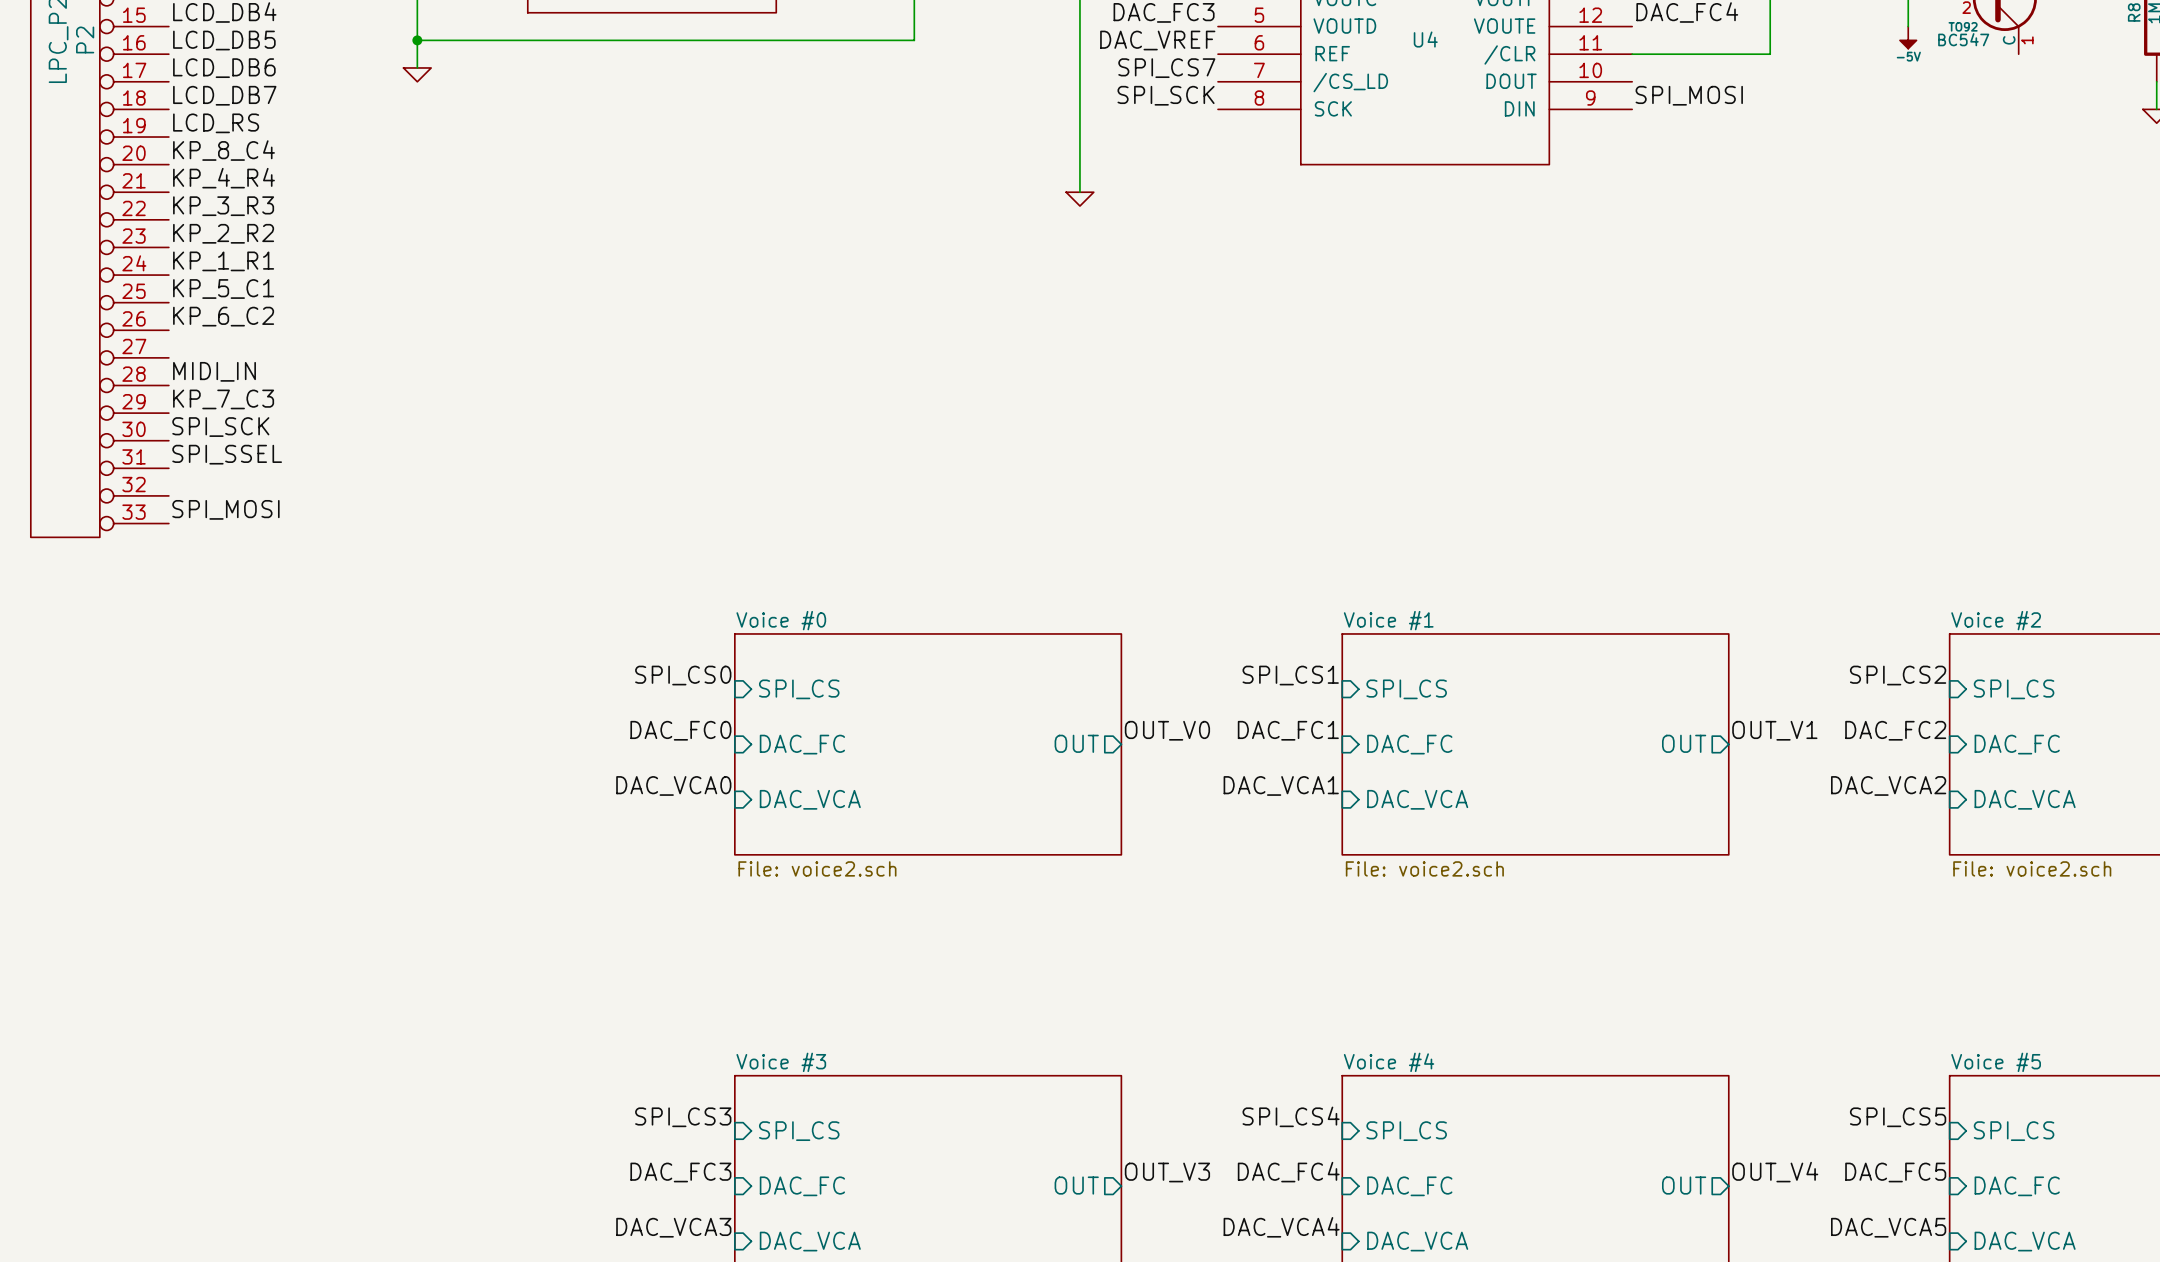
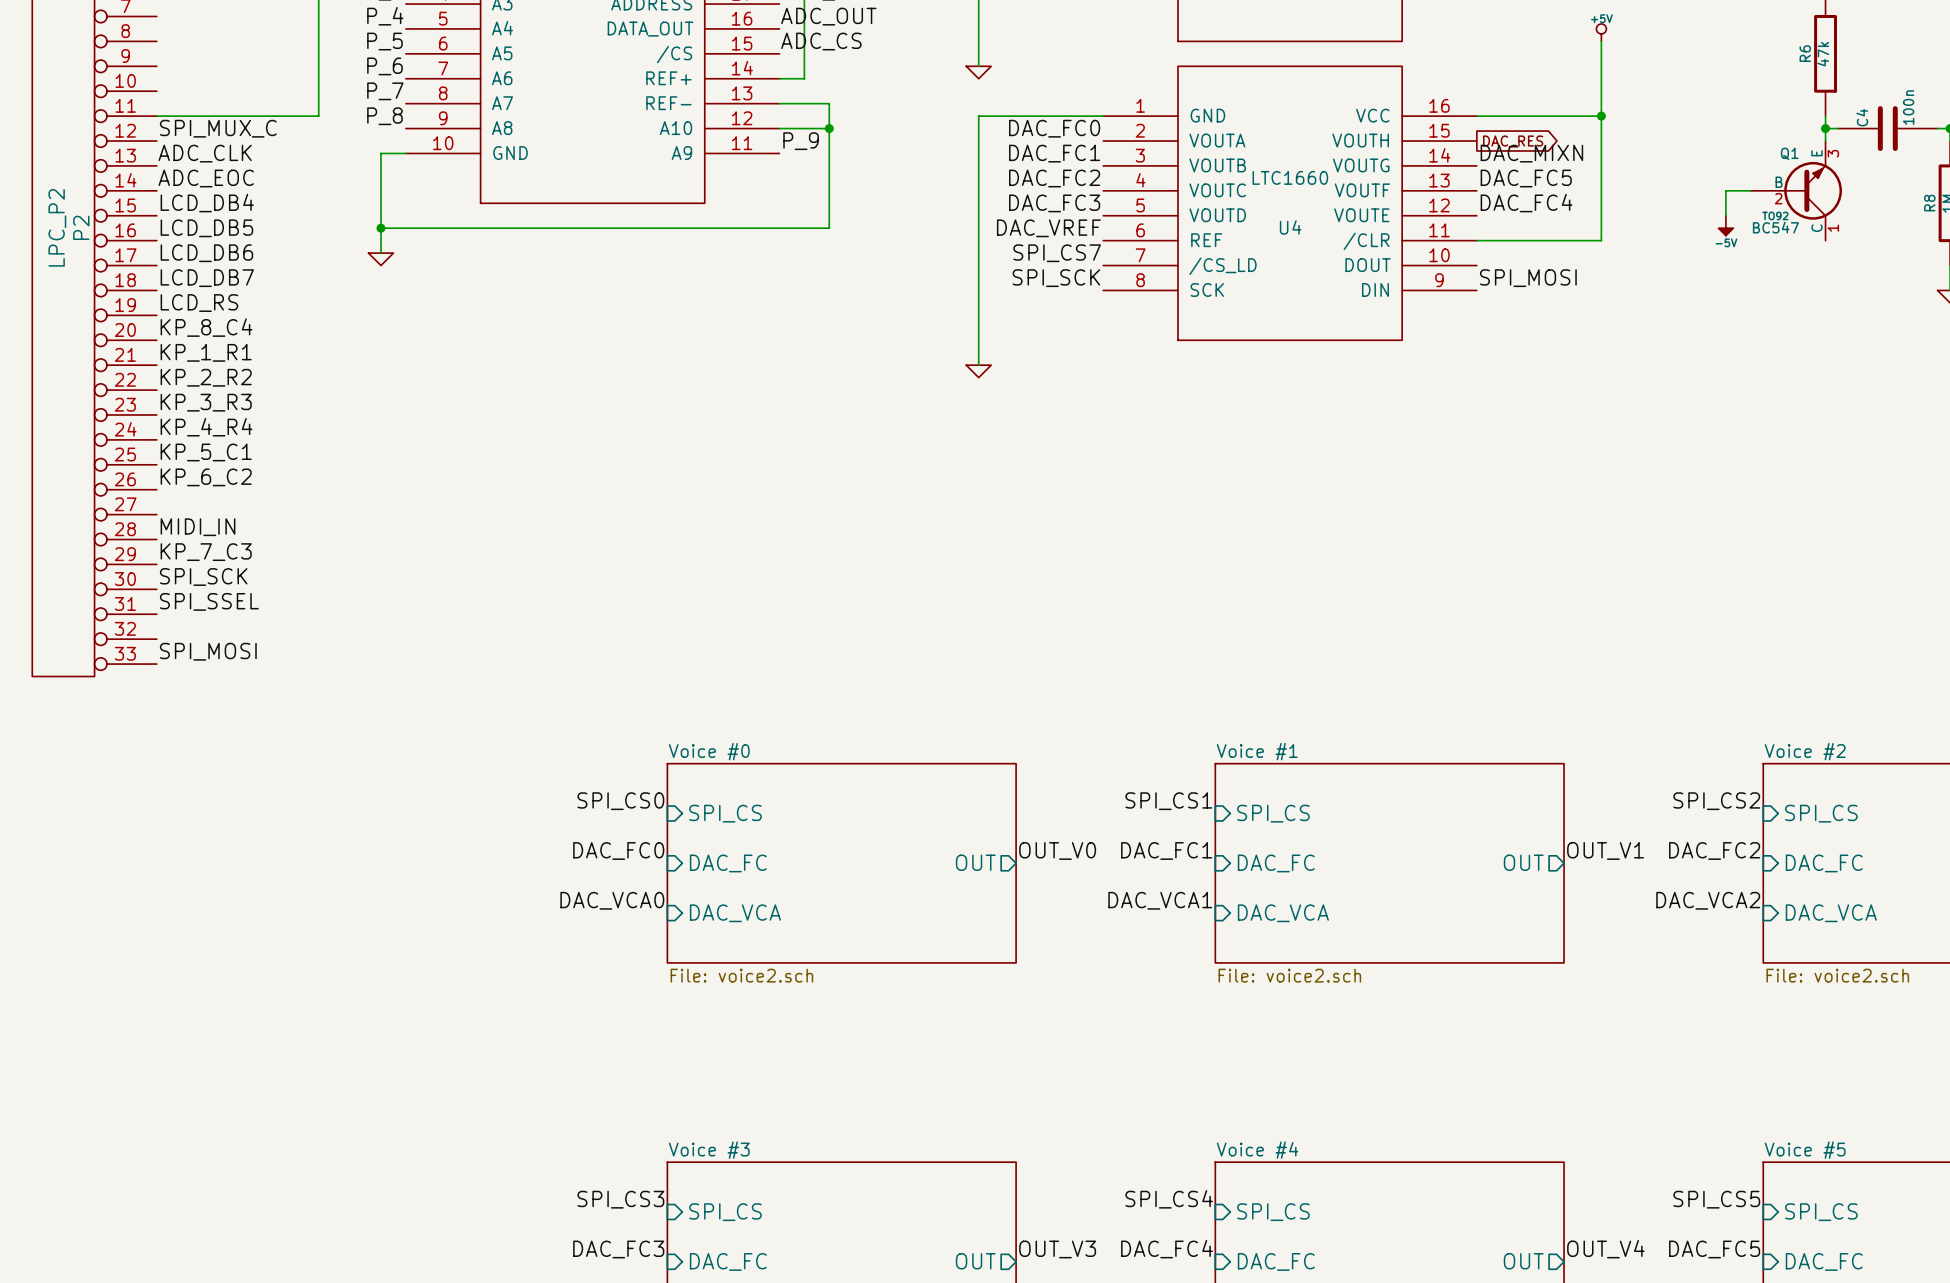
label: KP_4_R4 (223, 178) -> KP_1_R1 (206, 352)
label: KP_3_R3 (223, 206) -> KP_2_R2 (206, 377)
label: KP_2_R2 (223, 233) -> KP_3_R3 (206, 402)
label: KP_1_R1 (223, 261) -> KP_4_R4 (206, 427)

